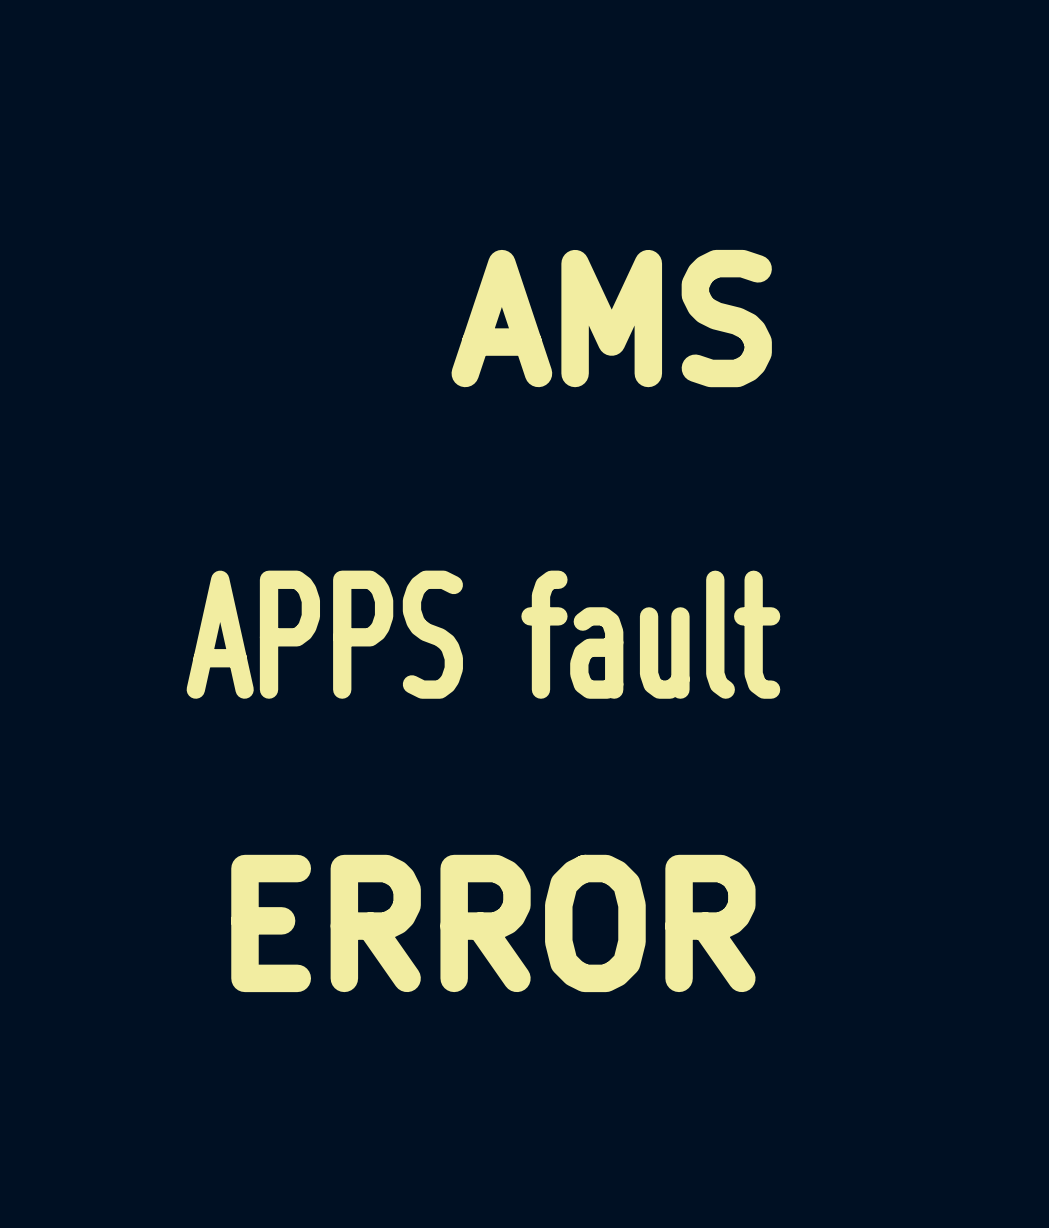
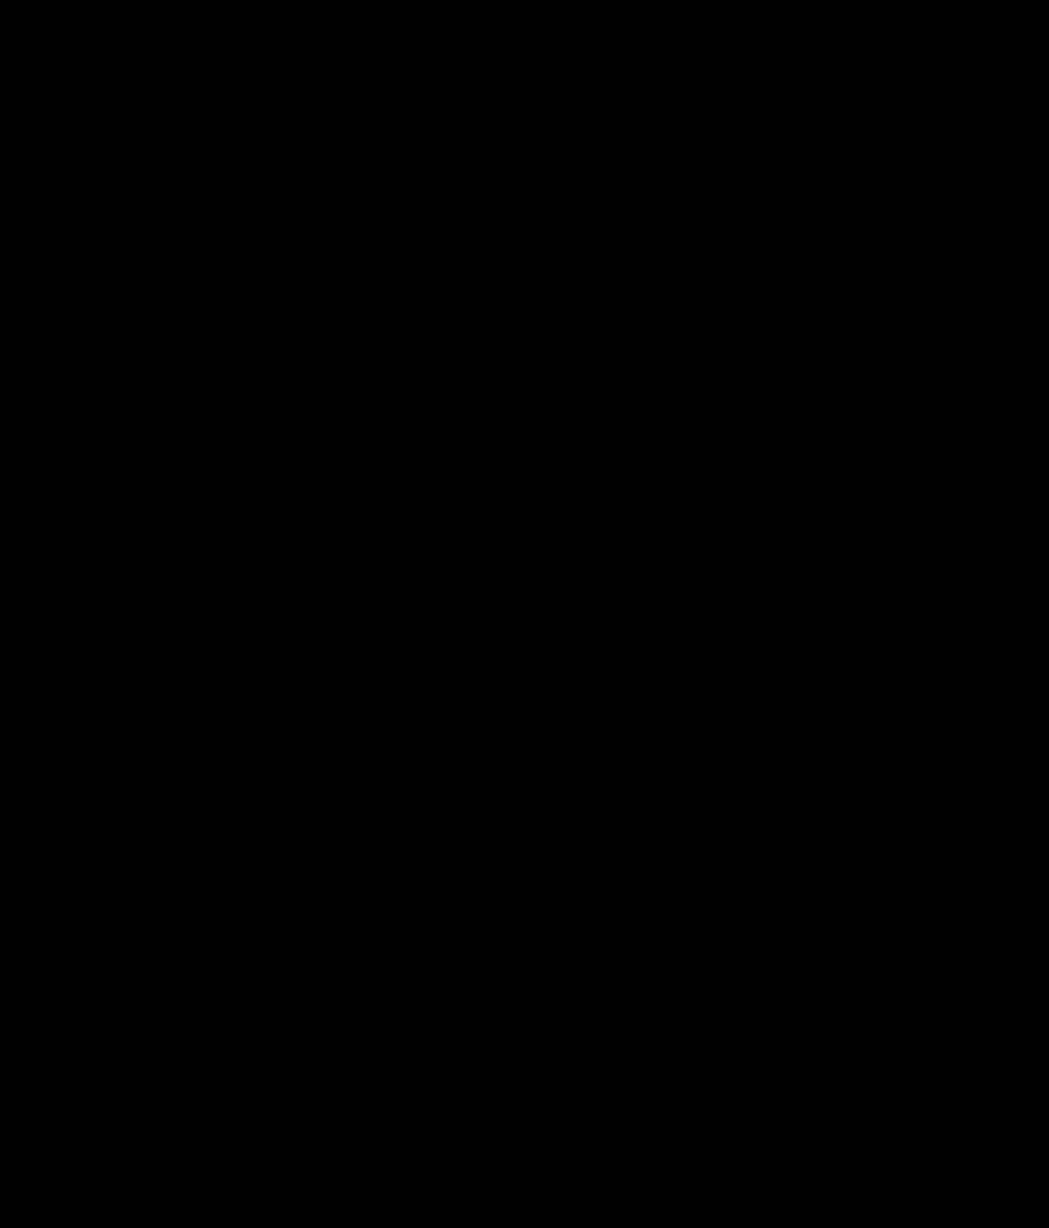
text: AMS (611, 318) -> none
text: APPS fault (483, 634) -> none
text: ERROR (493, 923) -> none

